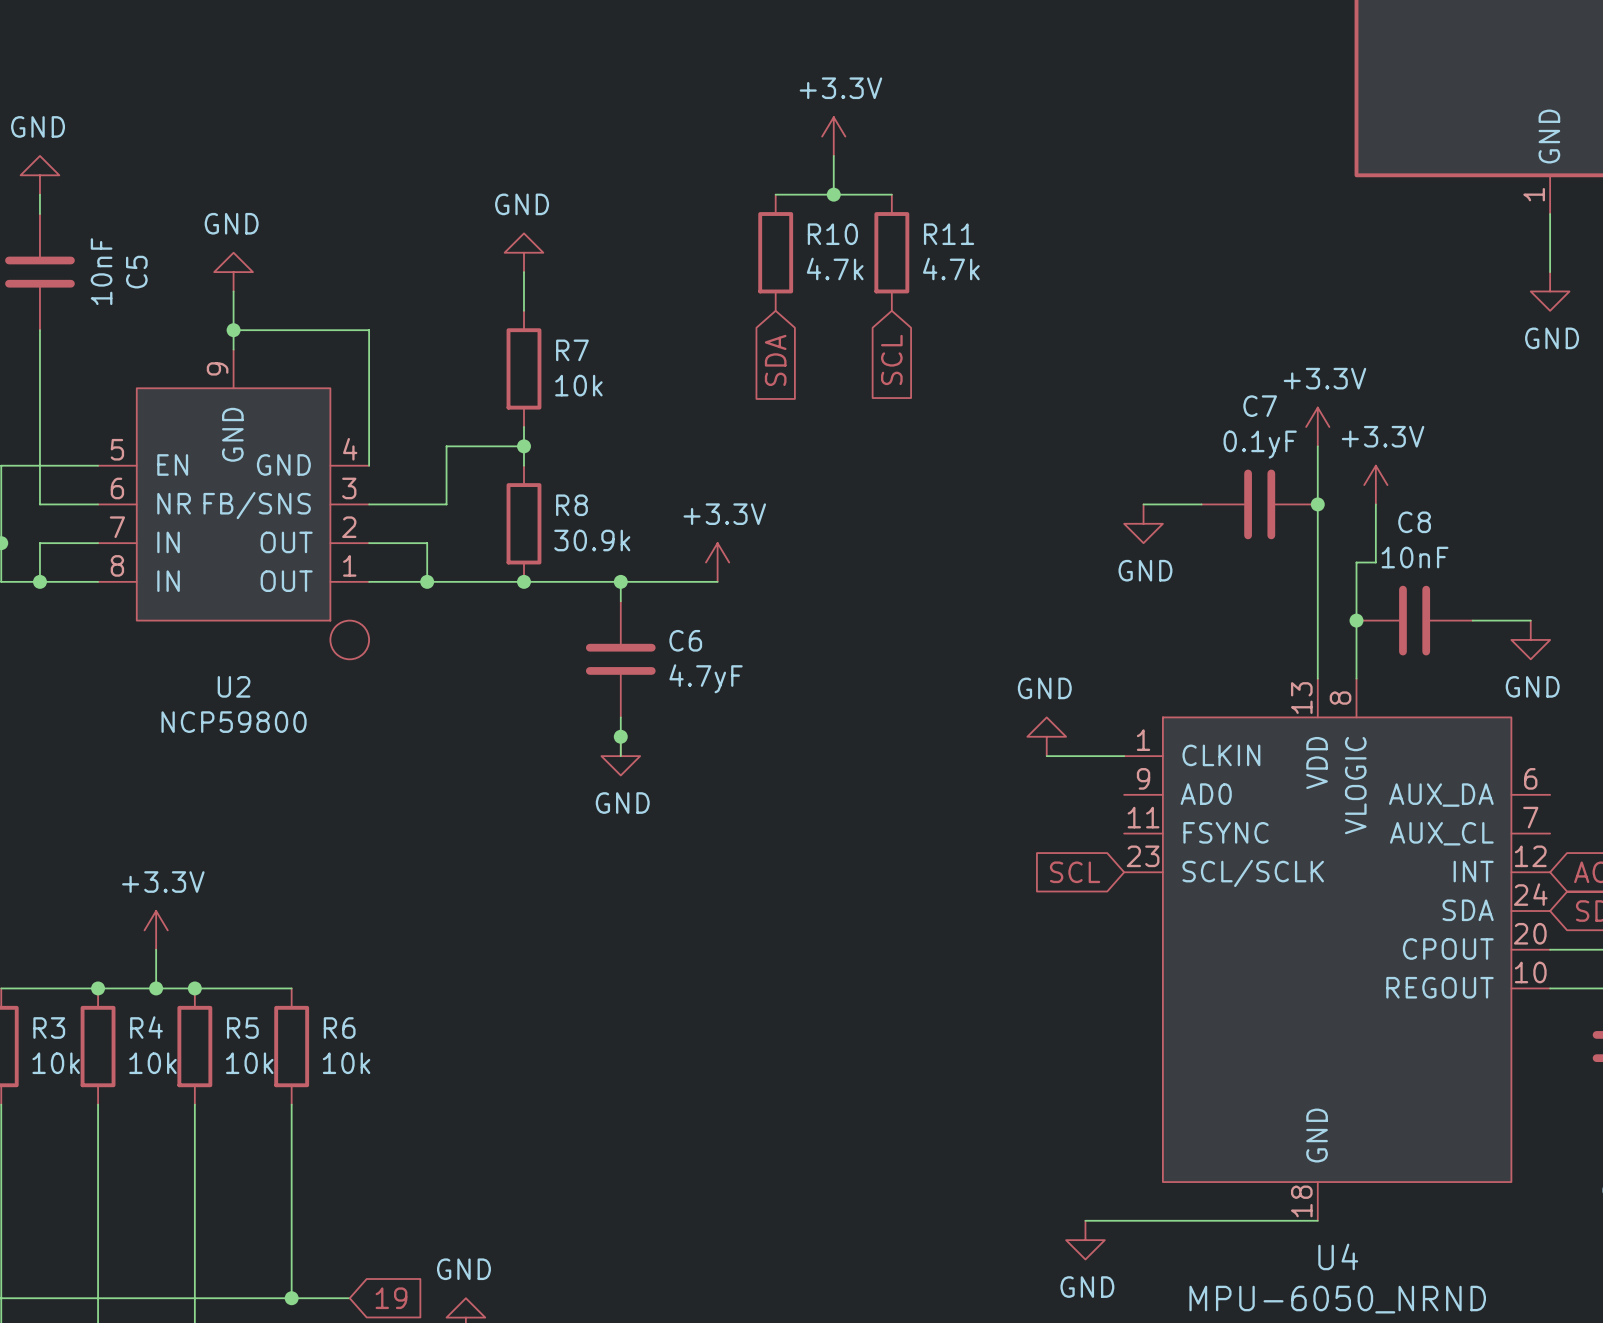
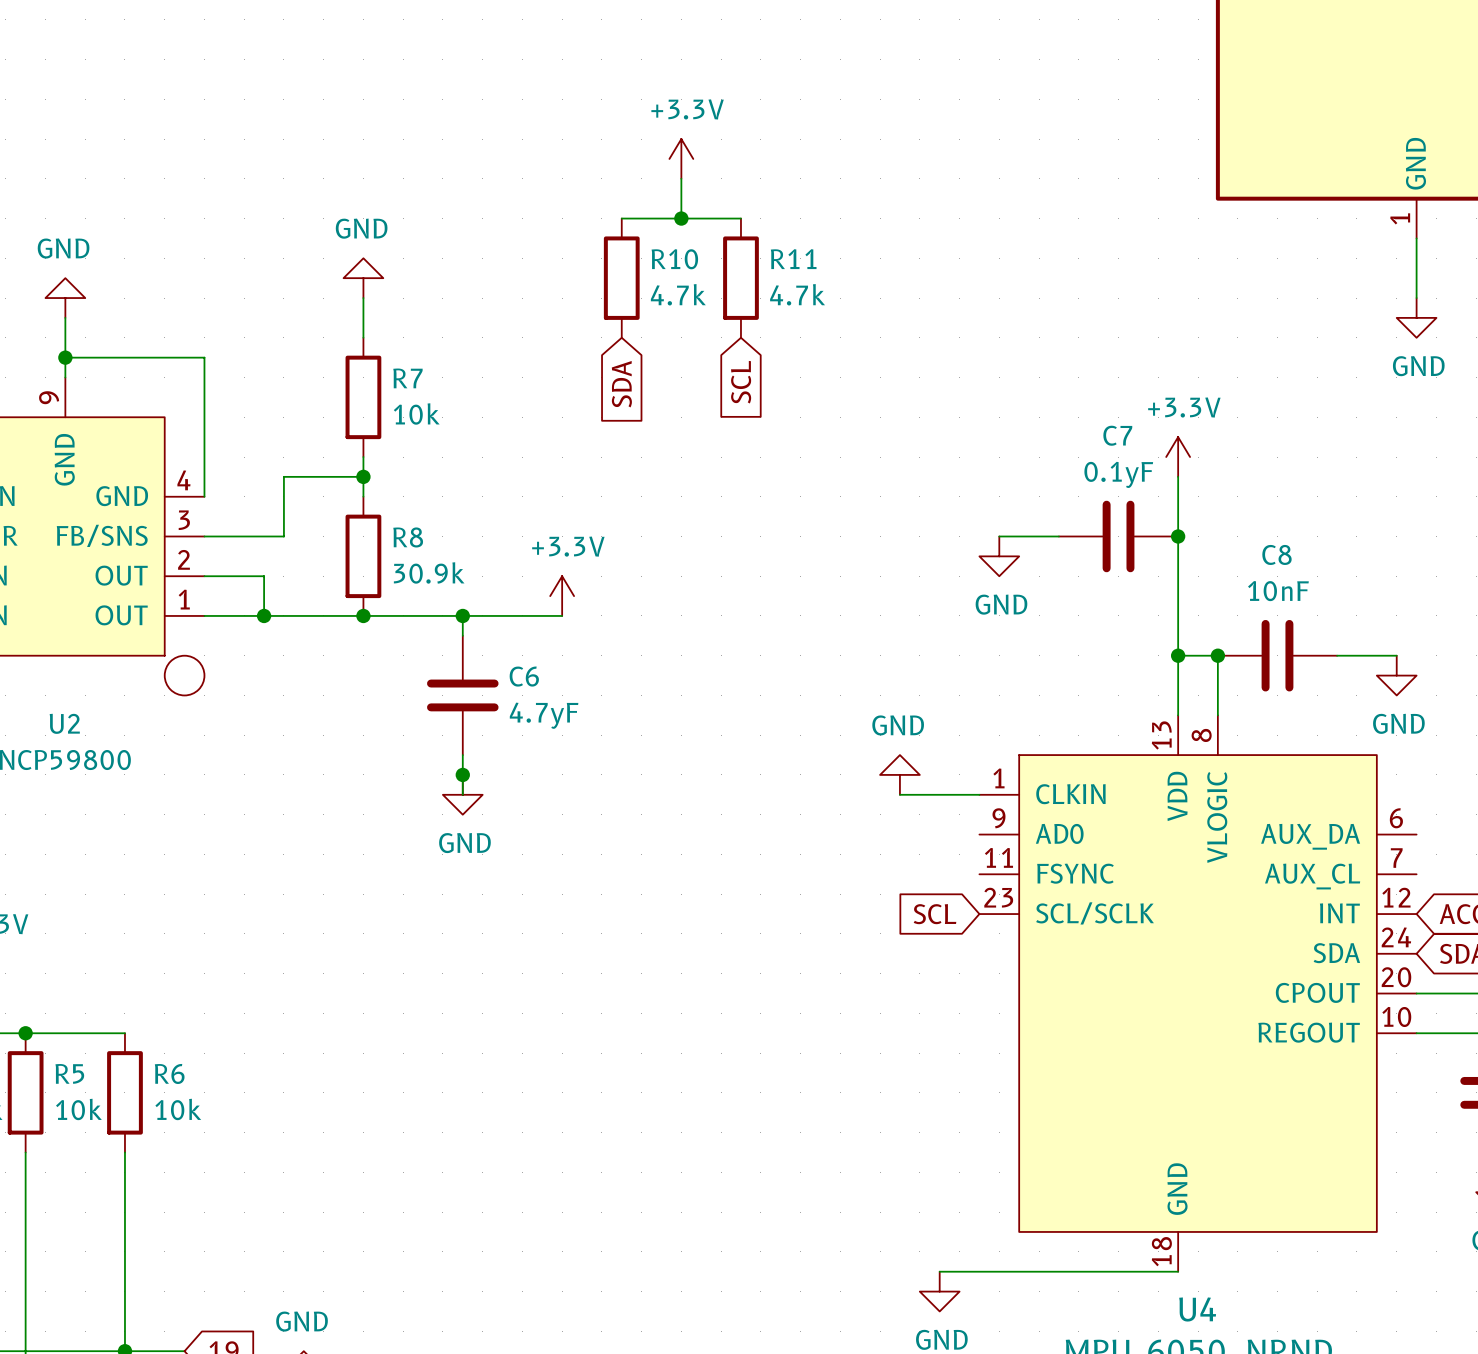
power symbol: +3.3V (1375, 485) -> none
wire: (1375, 504) (1375, 562) (1356, 562) (1356, 620) -> (1178, 655) (1217, 655)
junction: none -> (1178, 655)

